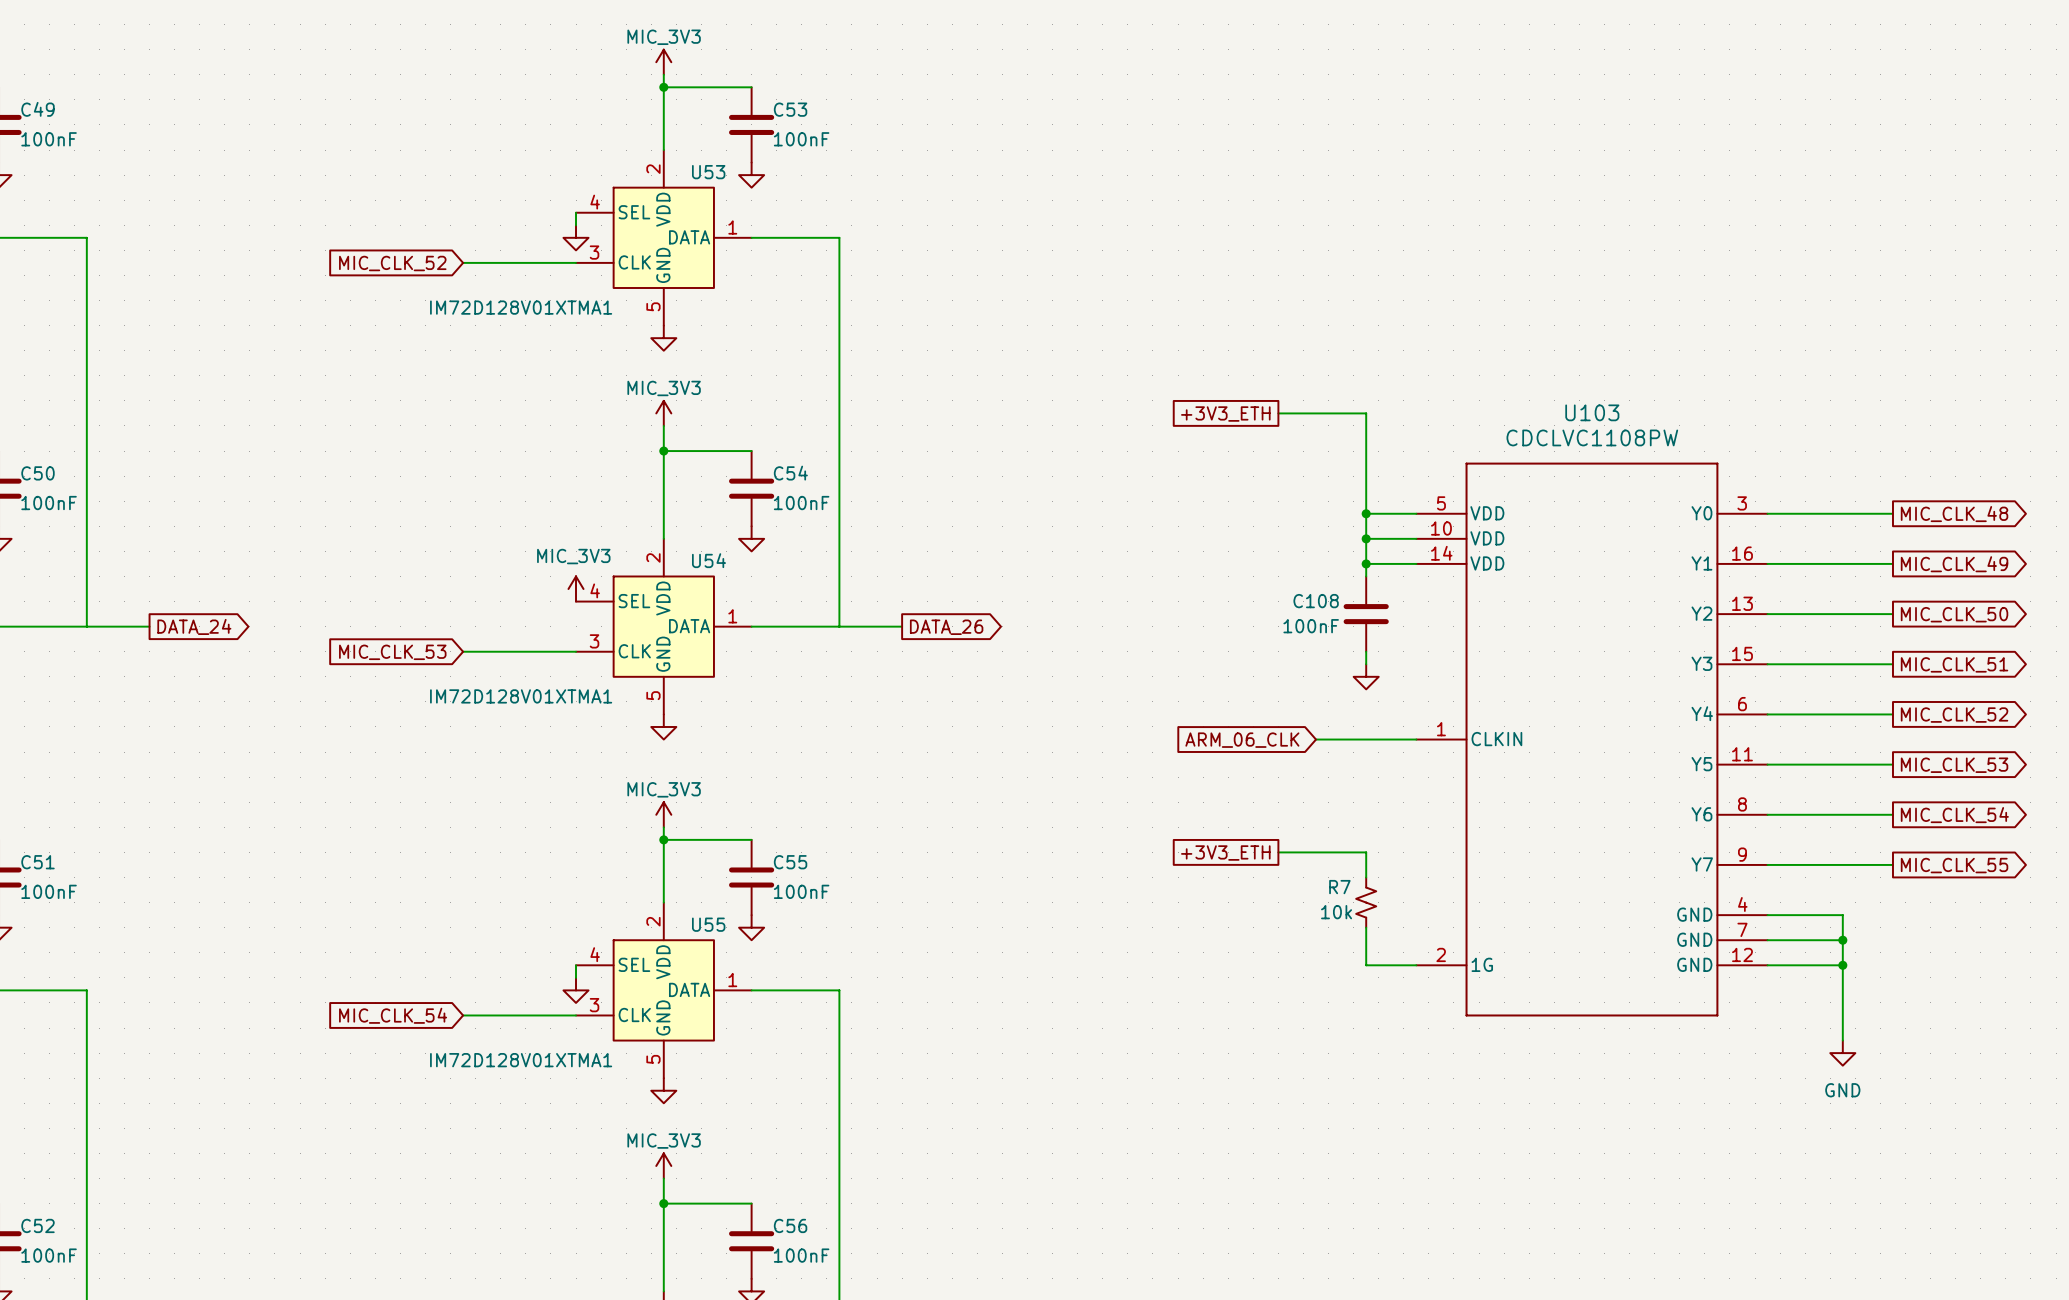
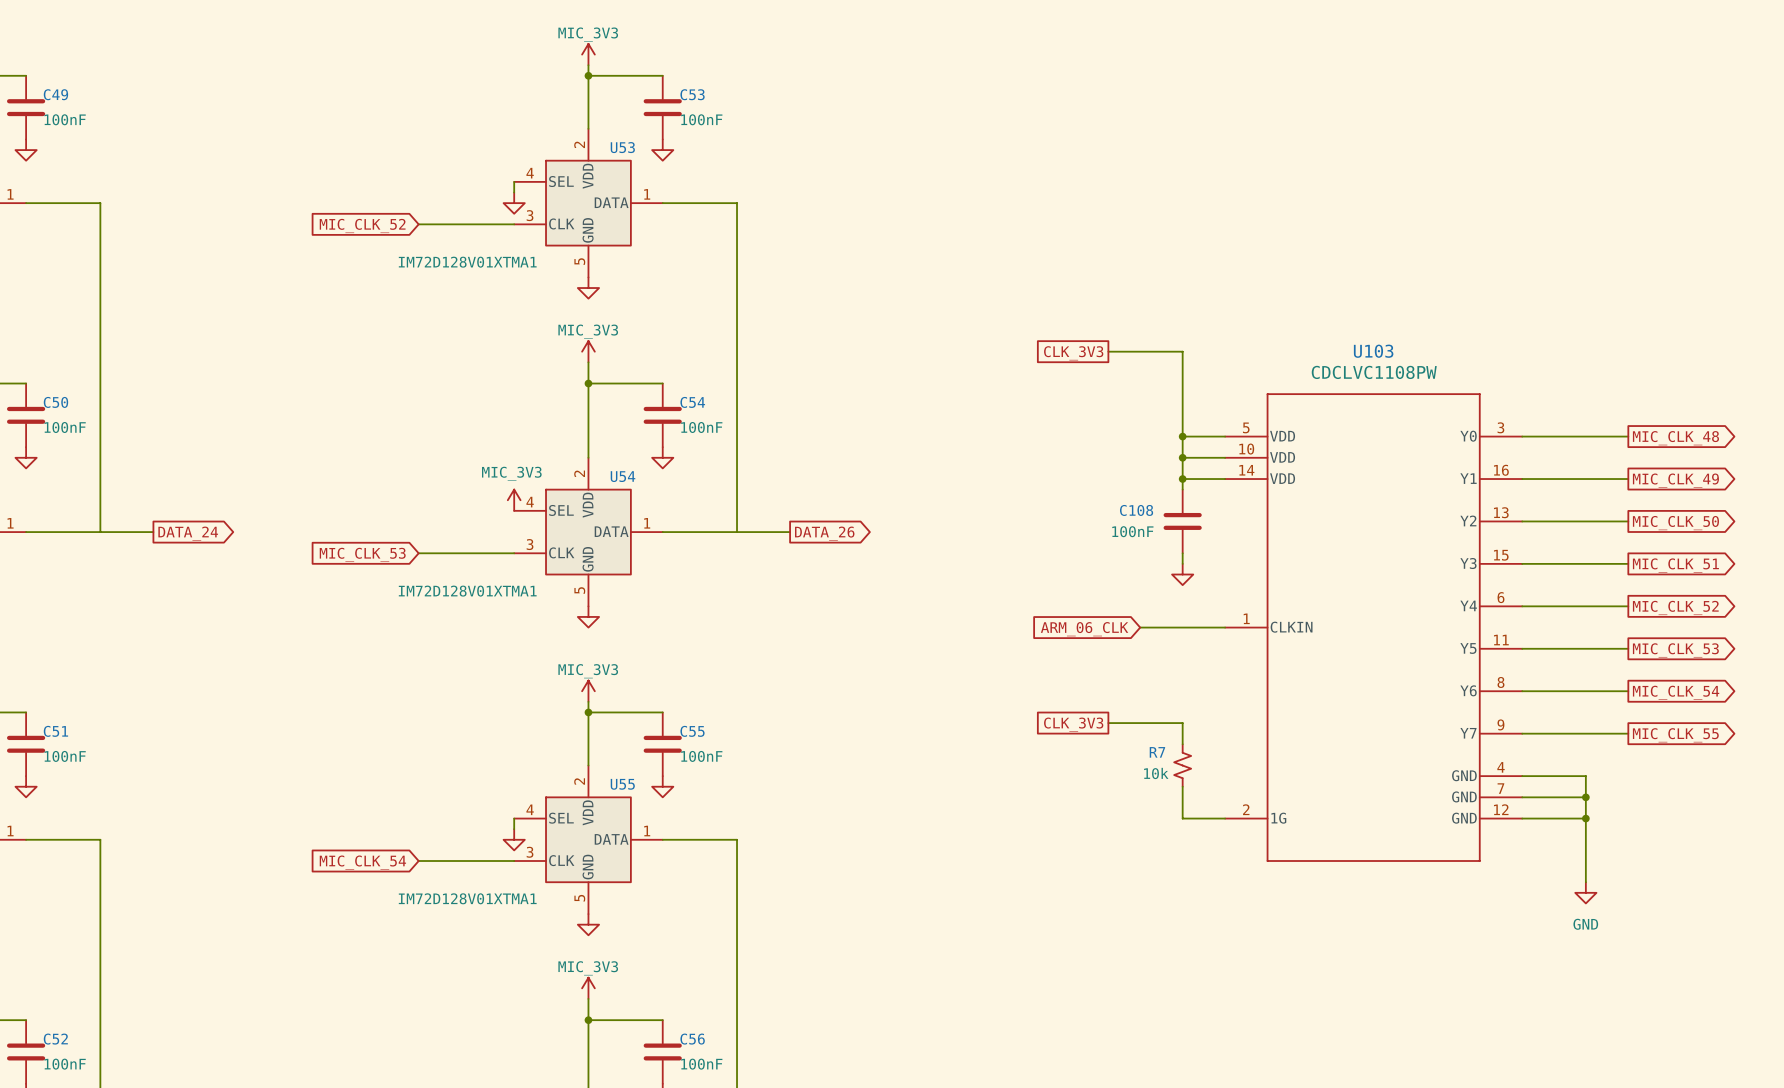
global label: +3V3_ETH (1225, 414) -> CLK_3V3 (1073, 353)
global label: +3V3_ETH (1225, 853) -> CLK_3V3 (1073, 724)

